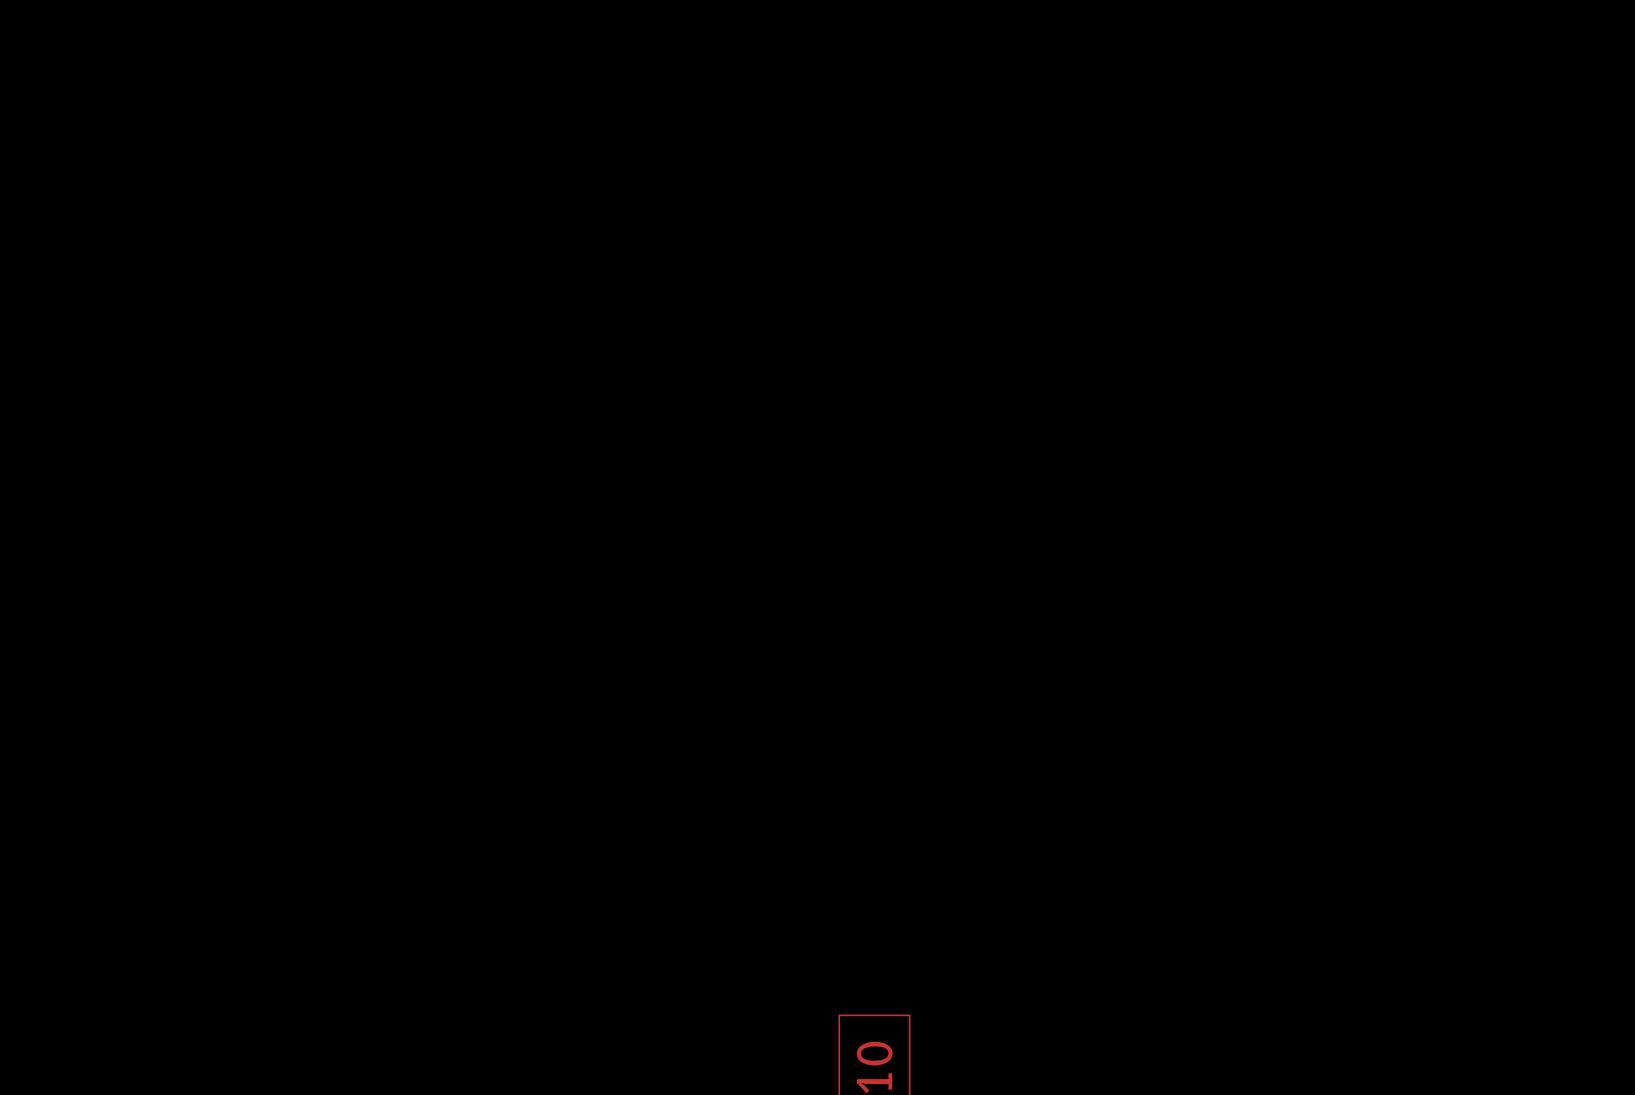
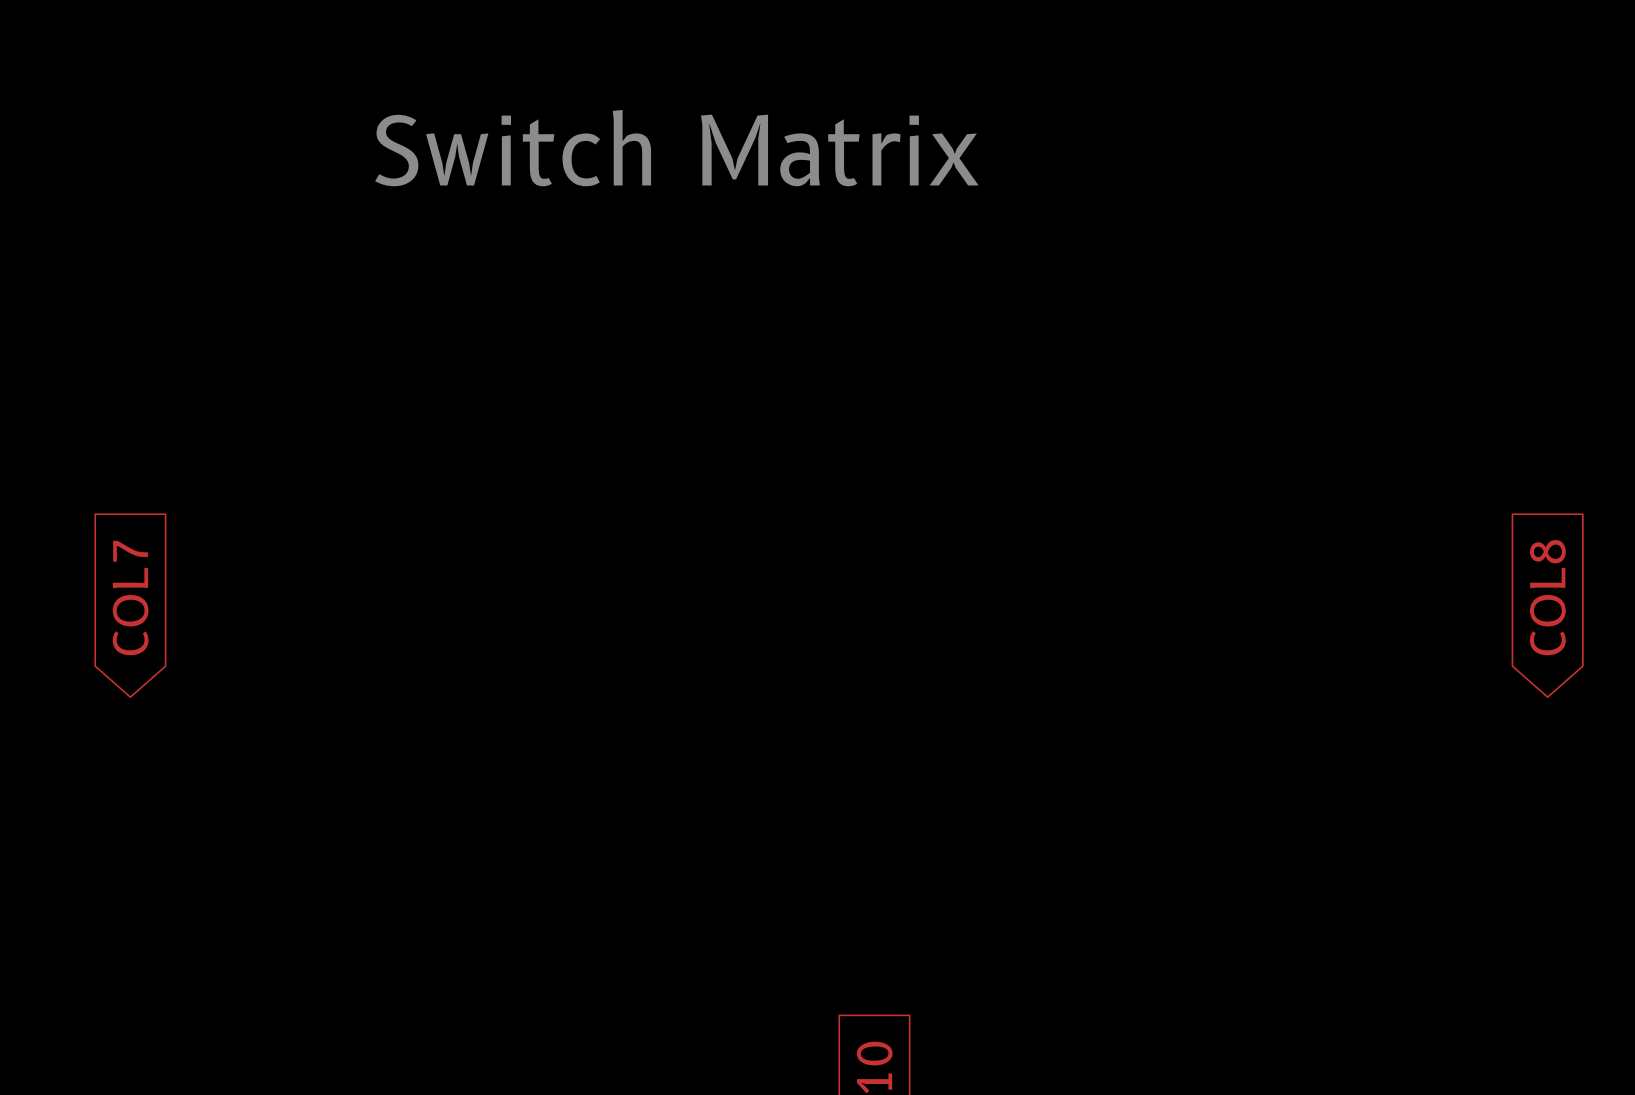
text: none -> Switch Matrix (676, 148)
global label: none -> COL8 (1547, 597)
global label: none -> COL7 (130, 598)

